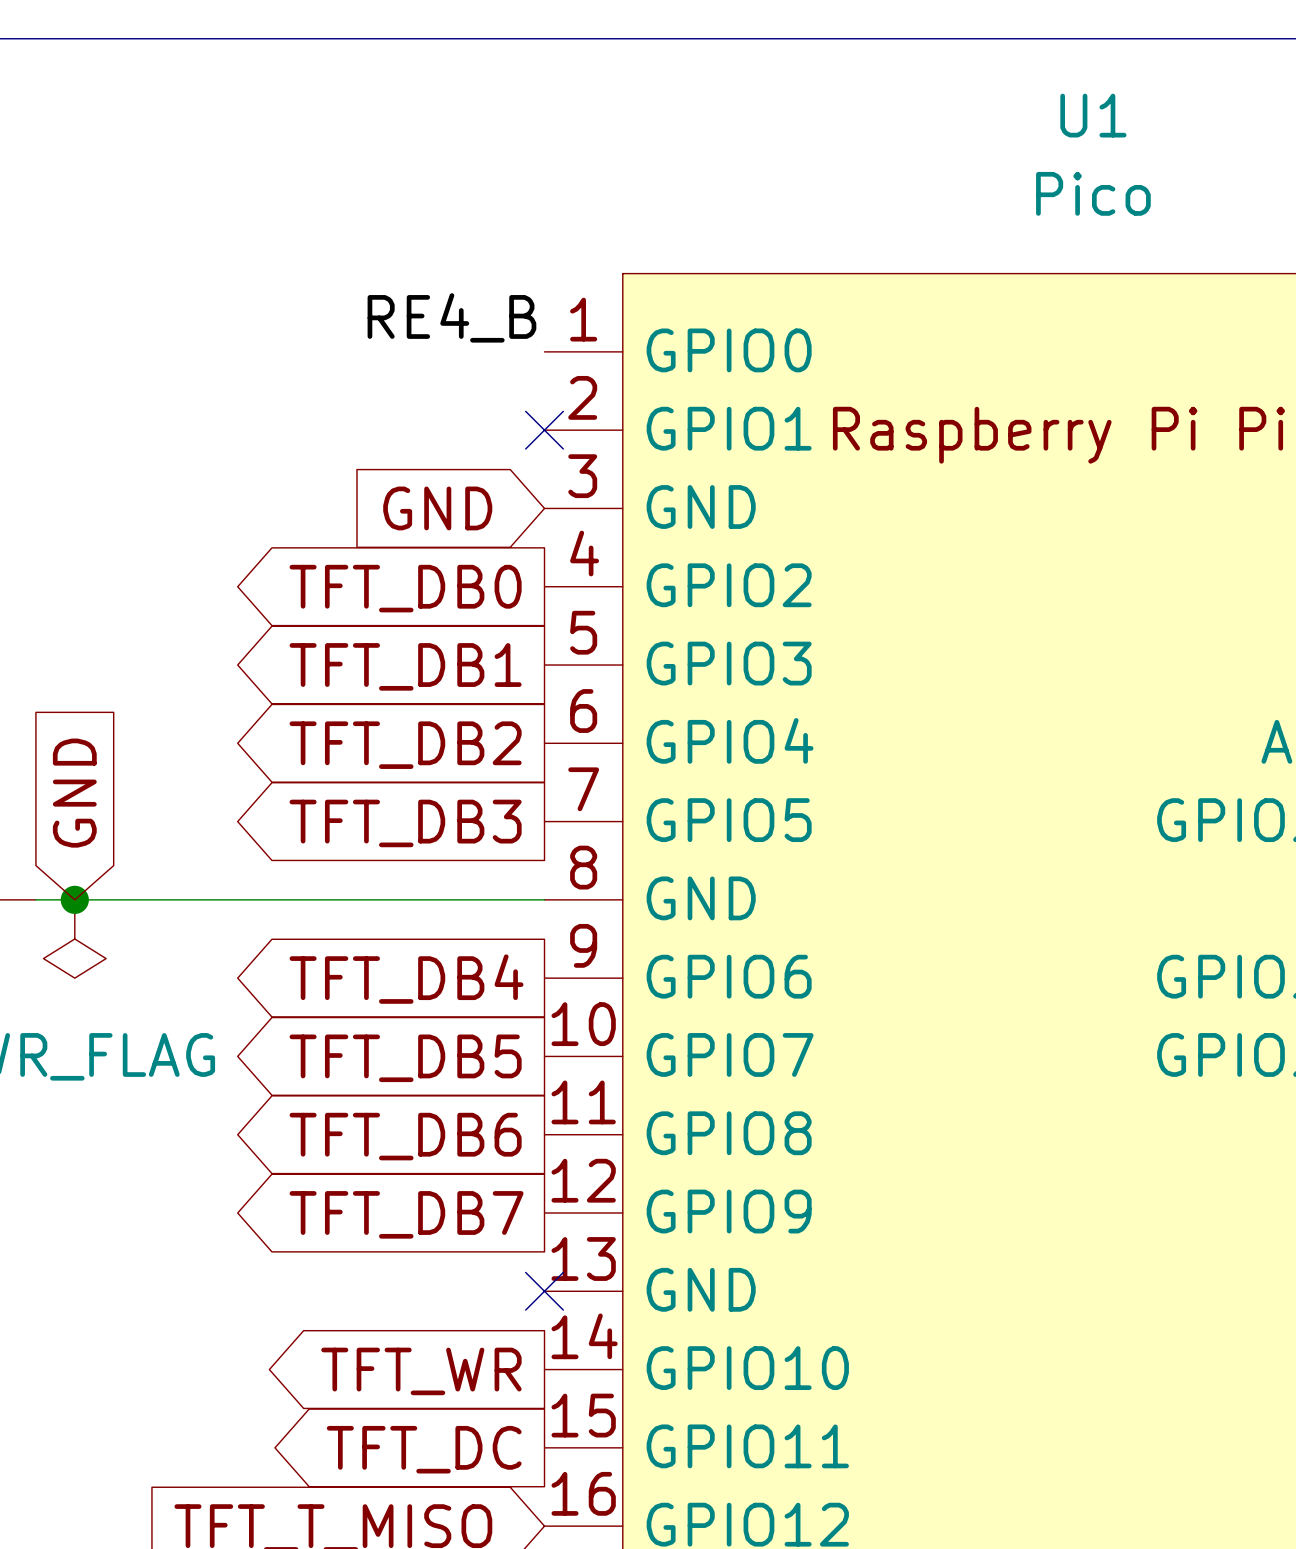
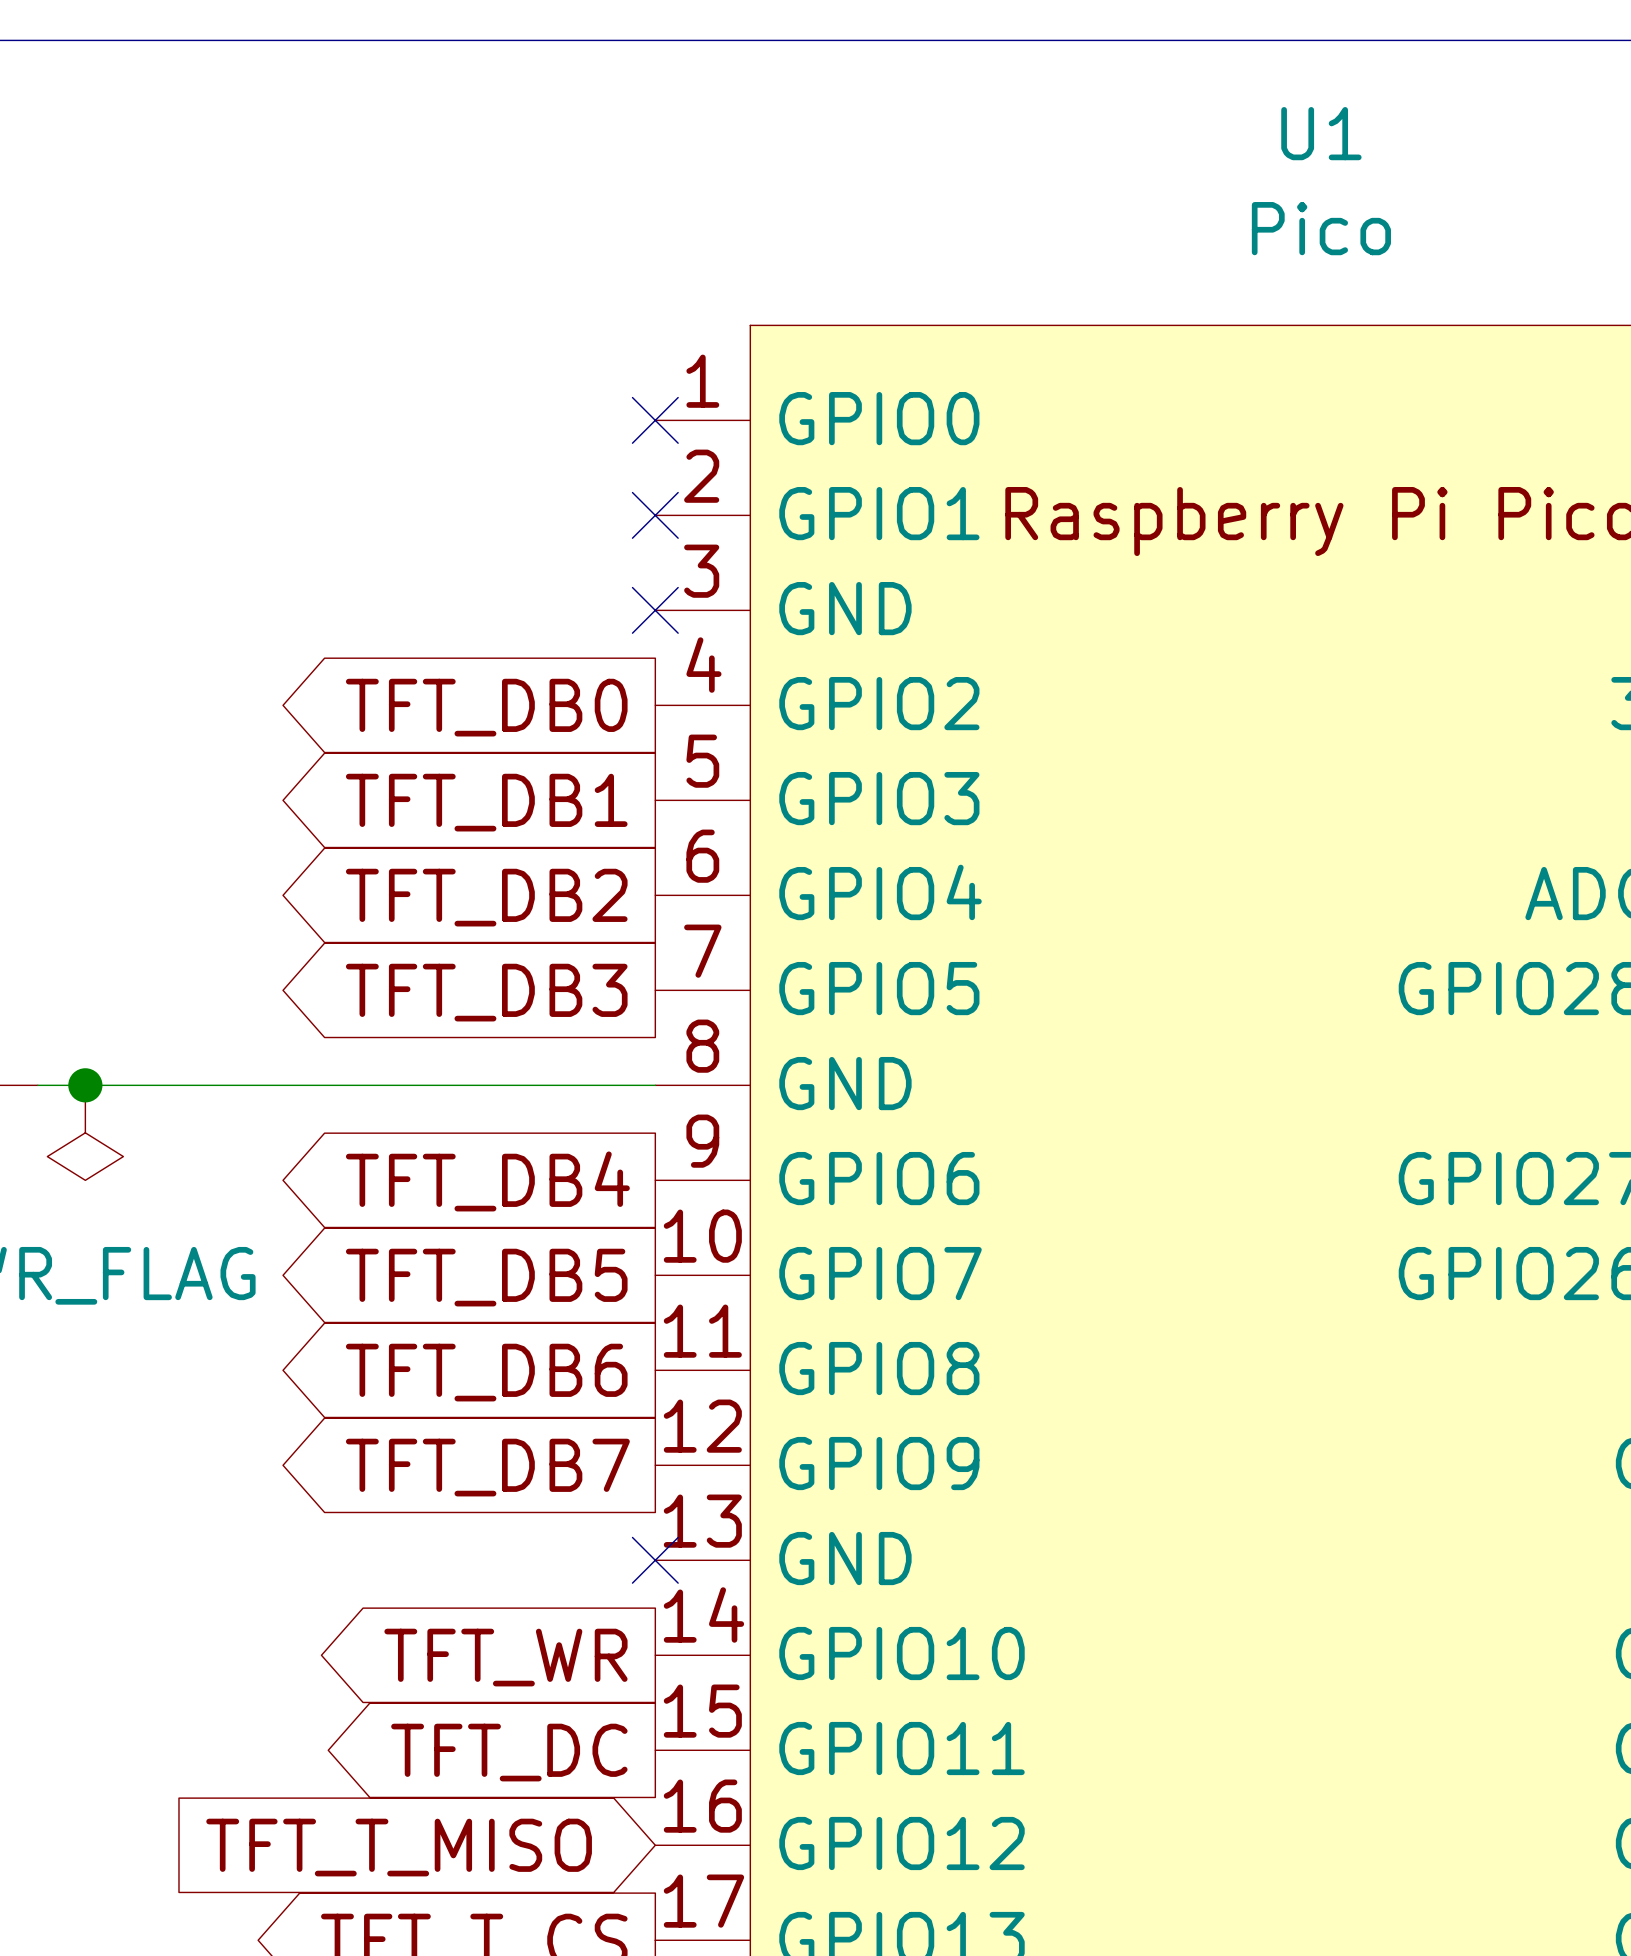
label: RE4_B (451, 317) -> none
no-connect mark: none -> (655, 420)
global label: GND (437, 508) -> none
no-connect mark: none -> (655, 610)
global label: GND (74, 793) -> none

